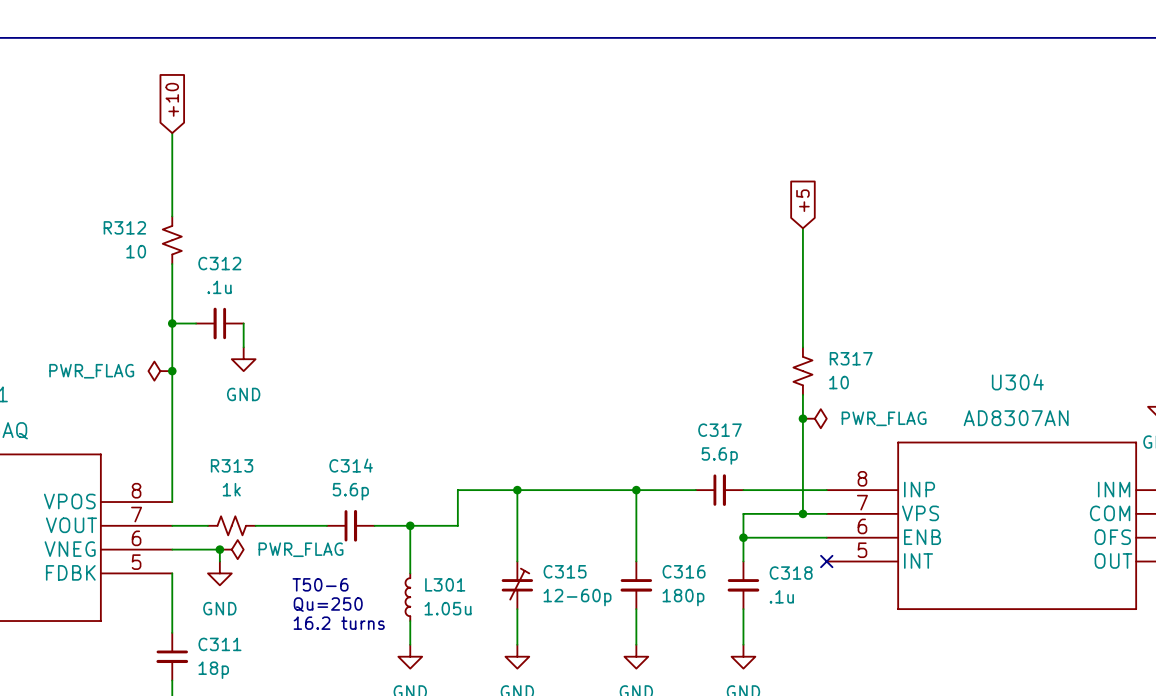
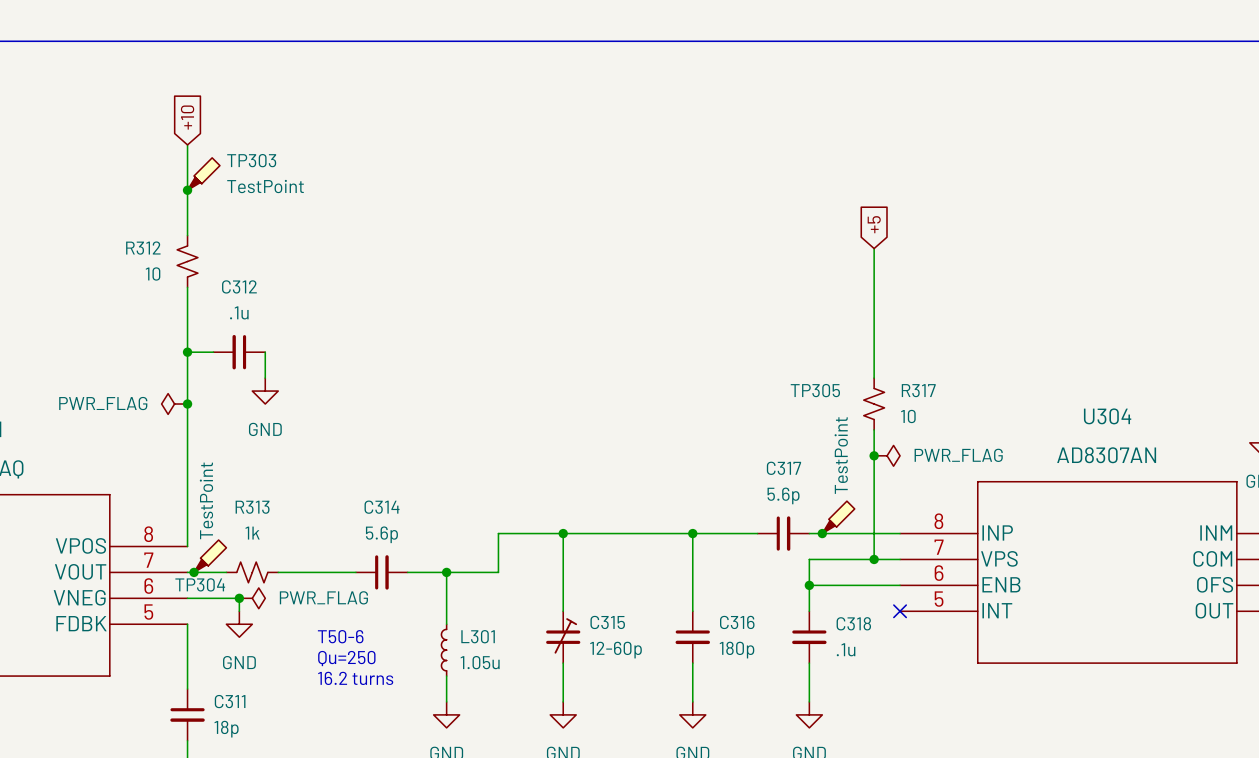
TP303: none -> TestPoint (203, 174)
junction: none -> (187, 190)
TP305: none -> TestPoint (838, 517)
junction: none -> (822, 533)
TP304: none -> TestPoint (210, 556)
junction: none -> (194, 572)

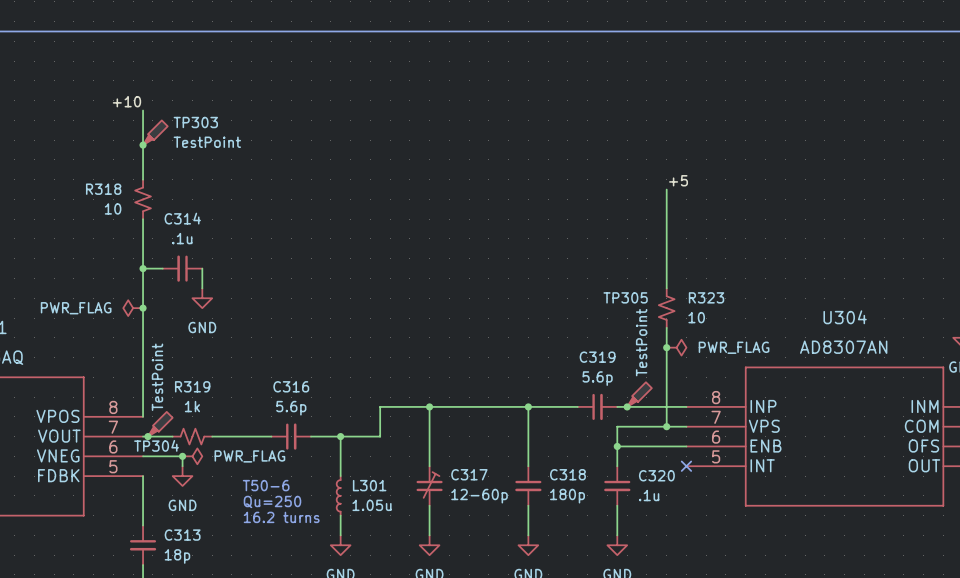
global label: +10 (187, 117) -> none
label: none -> +10 (126, 101)
global label: +5 (874, 224) -> none
label: none -> +5 (678, 180)
R312 name: R312 (143, 248) -> R318 (103, 189)
C312 name: C312 (239, 286) -> C314 (182, 218)
R317 name: R317 (918, 390) -> R323 (706, 297)
C317 name: C317 (783, 468) -> C319 (597, 357)
R313 name: R313 (252, 507) -> R319 (192, 386)
C314 name: C314 (382, 507) -> C316 (291, 386)
C315 name: C315 (607, 622) -> C317 (469, 474)
C316 name: C316 (737, 622) -> C318 (567, 474)
C318 name: C318 (853, 623) -> C320 (656, 475)
C311 name: C311 (230, 701) -> C313 (182, 535)

